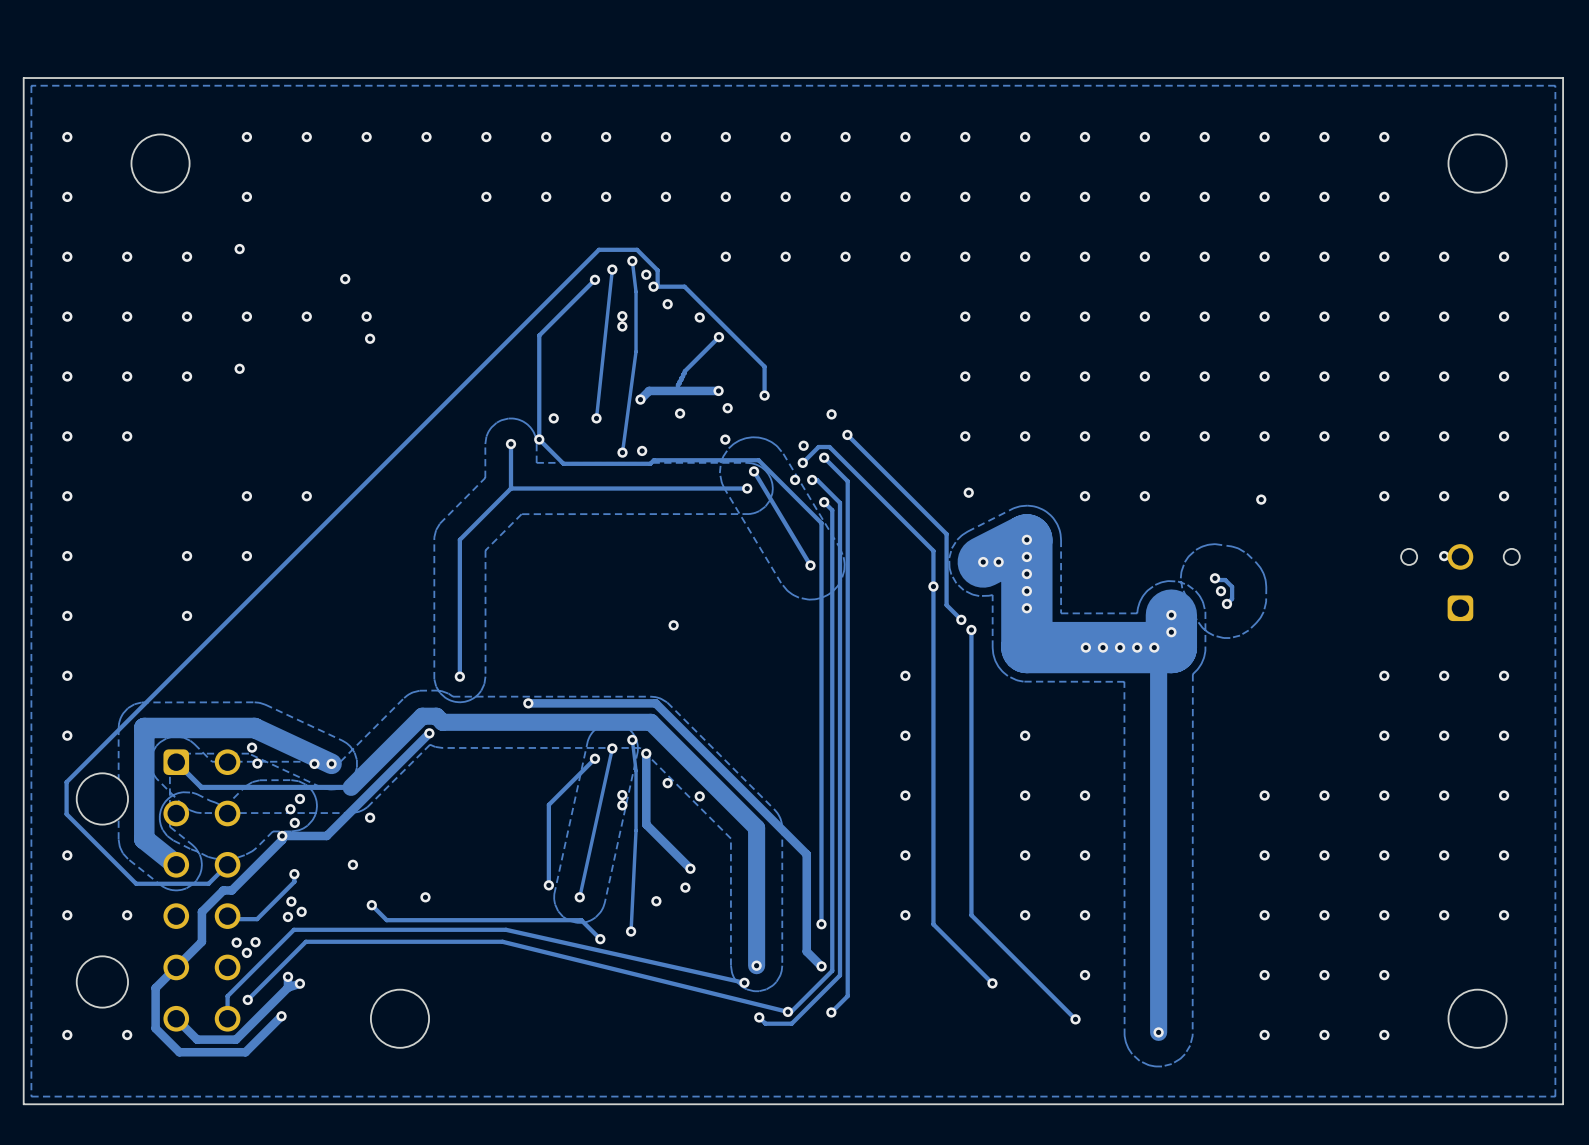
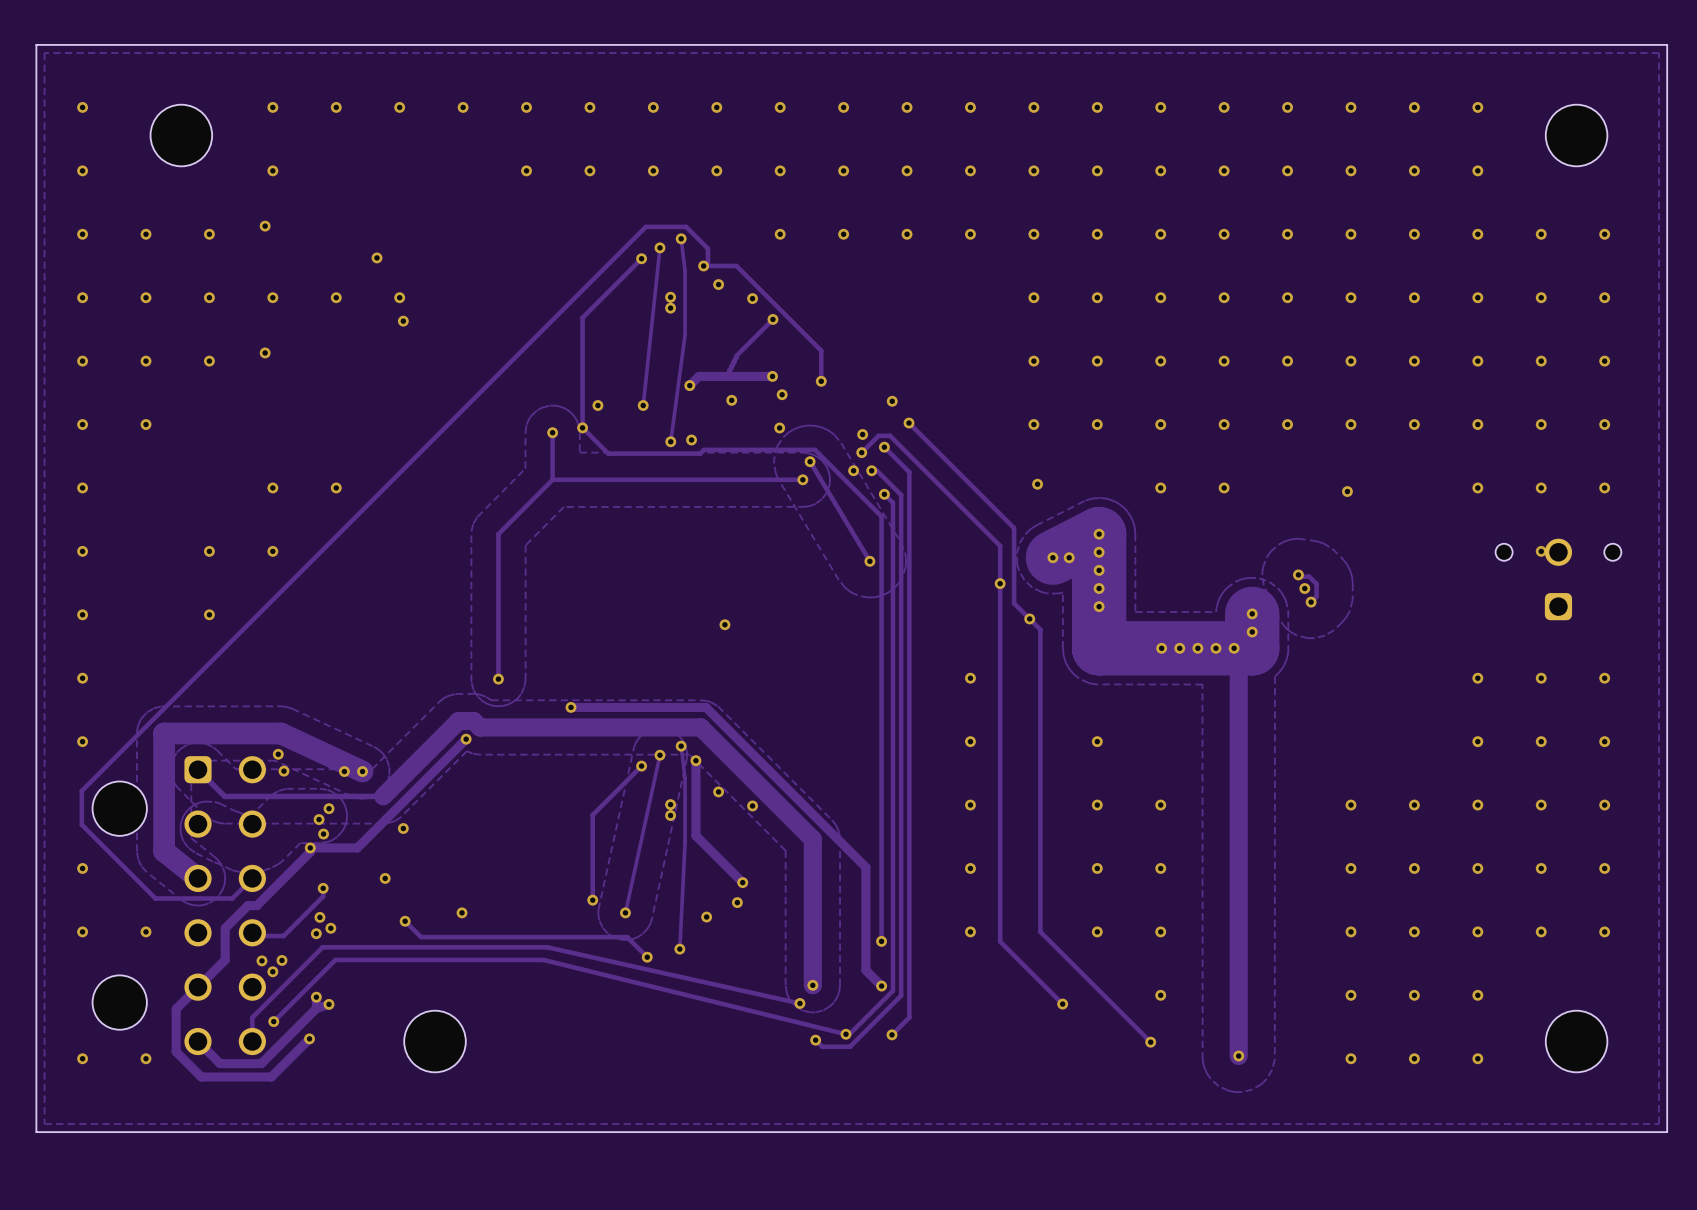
via: (646, 274) -> none
track: none -> (1029, 618) (1040, 629)
via: (971, 629) -> none

